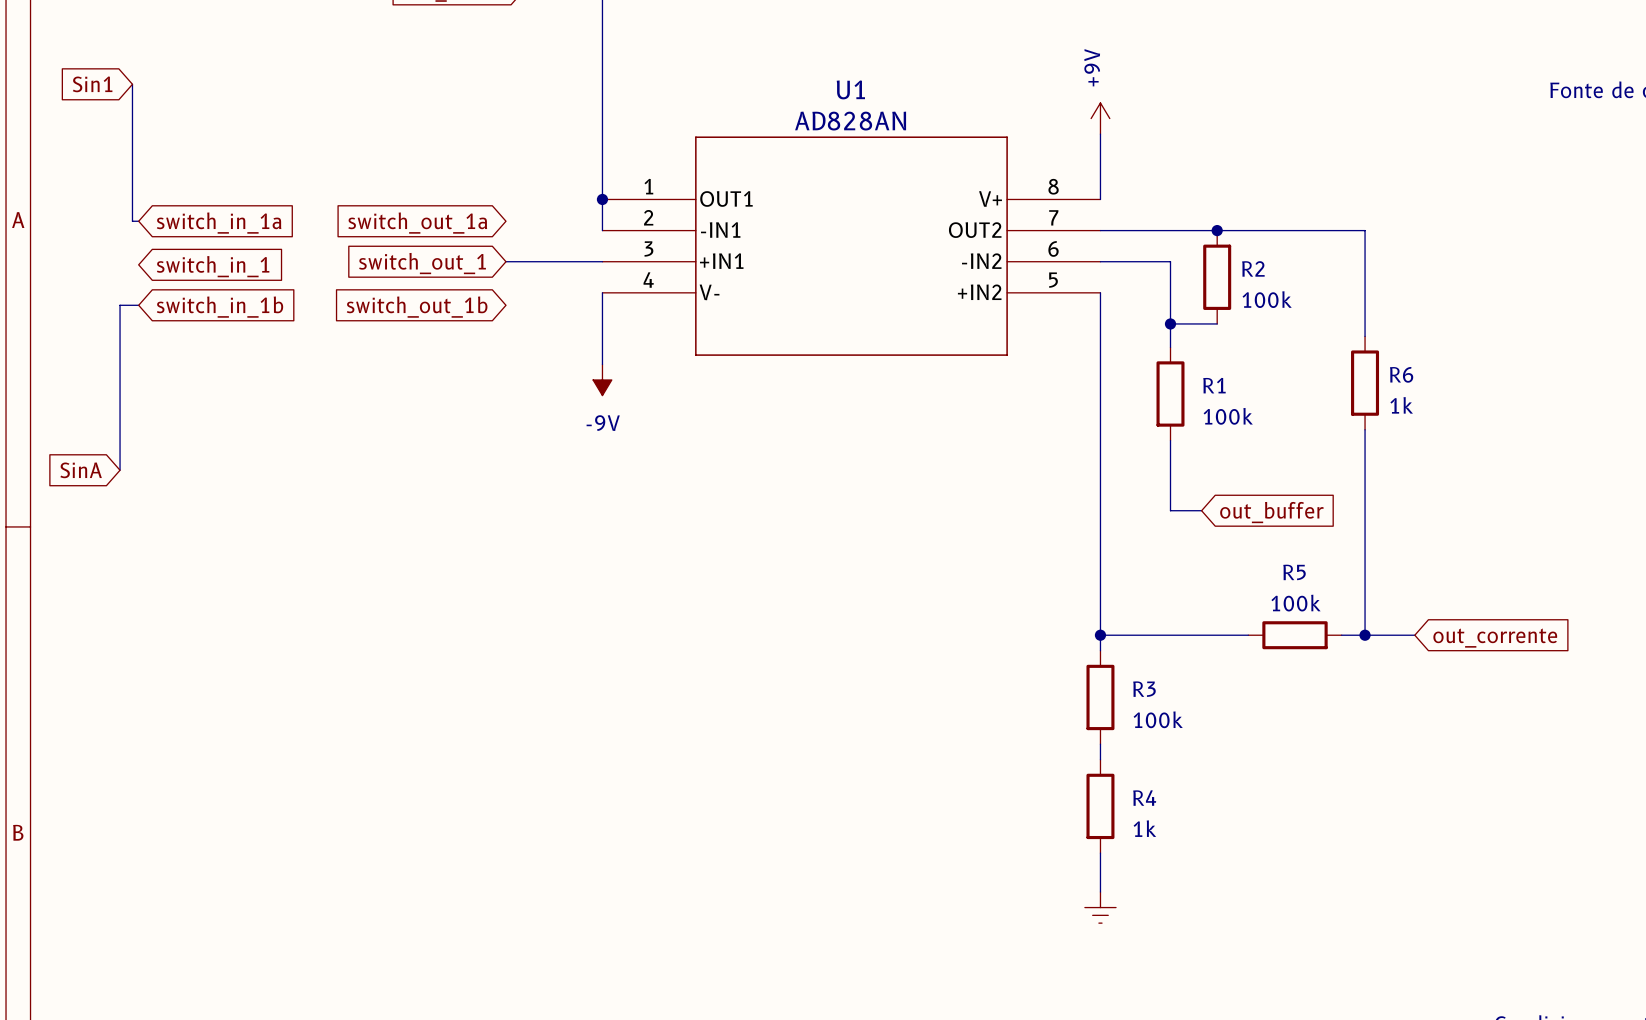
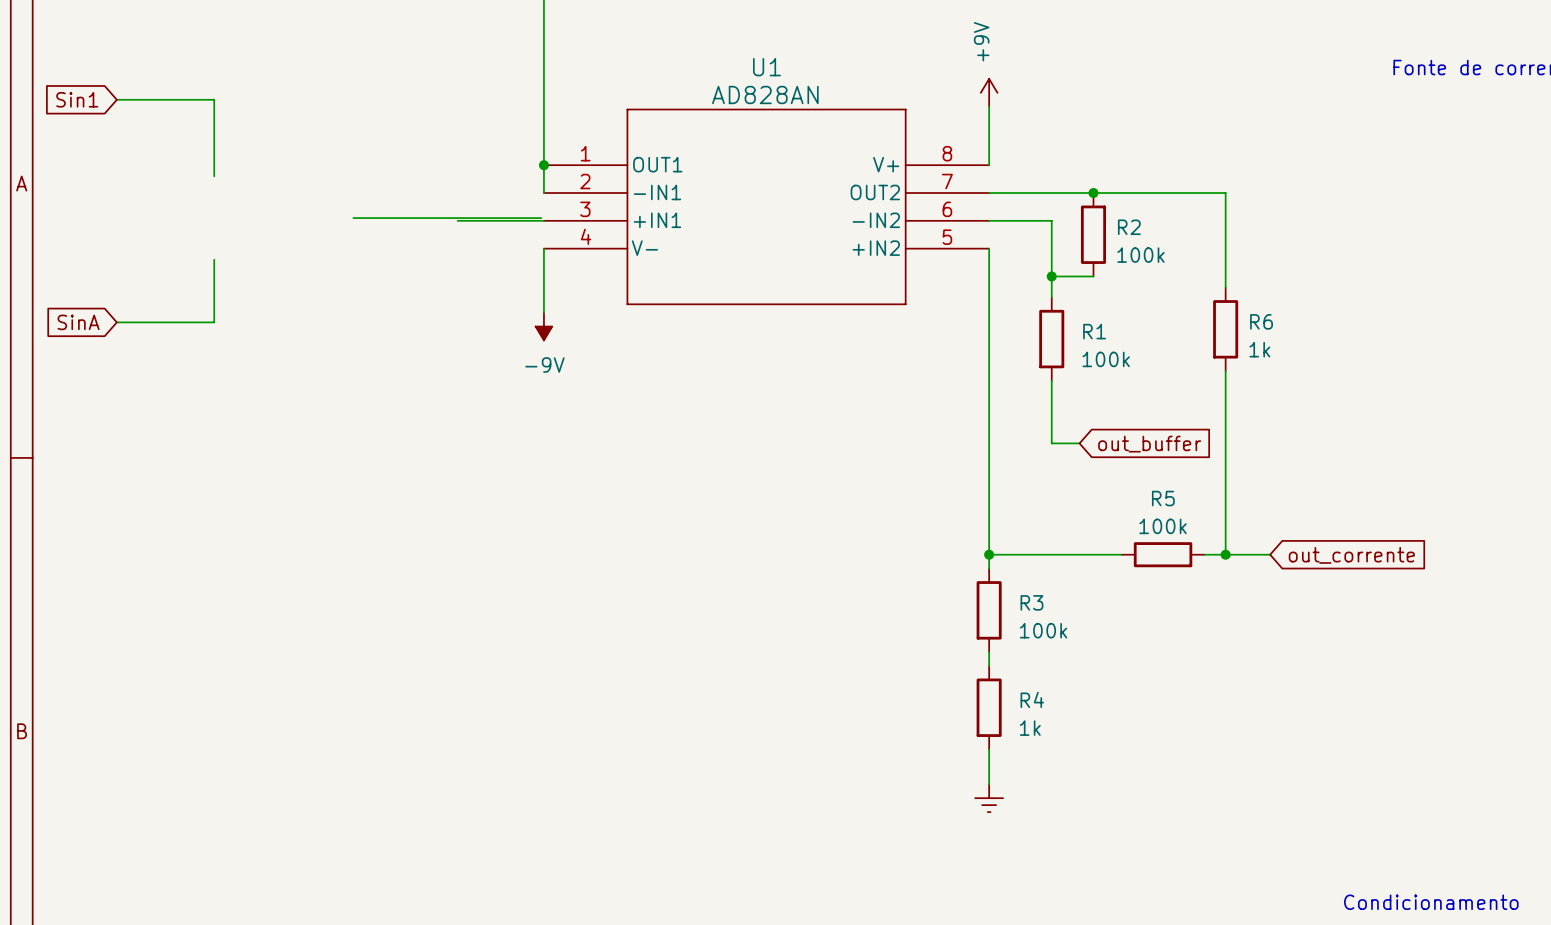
global label position: Sin1 (92, 84) -> Sin1 (77, 99)
wire: (132, 84) (132, 221) (138, 221) -> none
wire: none -> (116, 99) (214, 99) (214, 176)
global label: switch_in_1a (219, 223) -> none
global label: switch_out_1a (417, 223) -> none
wire: none -> (353, 218) (541, 218)
global label: switch_out_1 (422, 263) -> none
global label: switch_in_1 (213, 266) -> none
wire: (138, 305) (120, 305) (120, 470) -> none
wire: none -> (214, 259) (214, 322) (116, 322)
global label: switch_in_1b (220, 307) -> none
global label: switch_out_1b (417, 307) -> none
global label position: SinA (81, 470) -> SinA (78, 322)

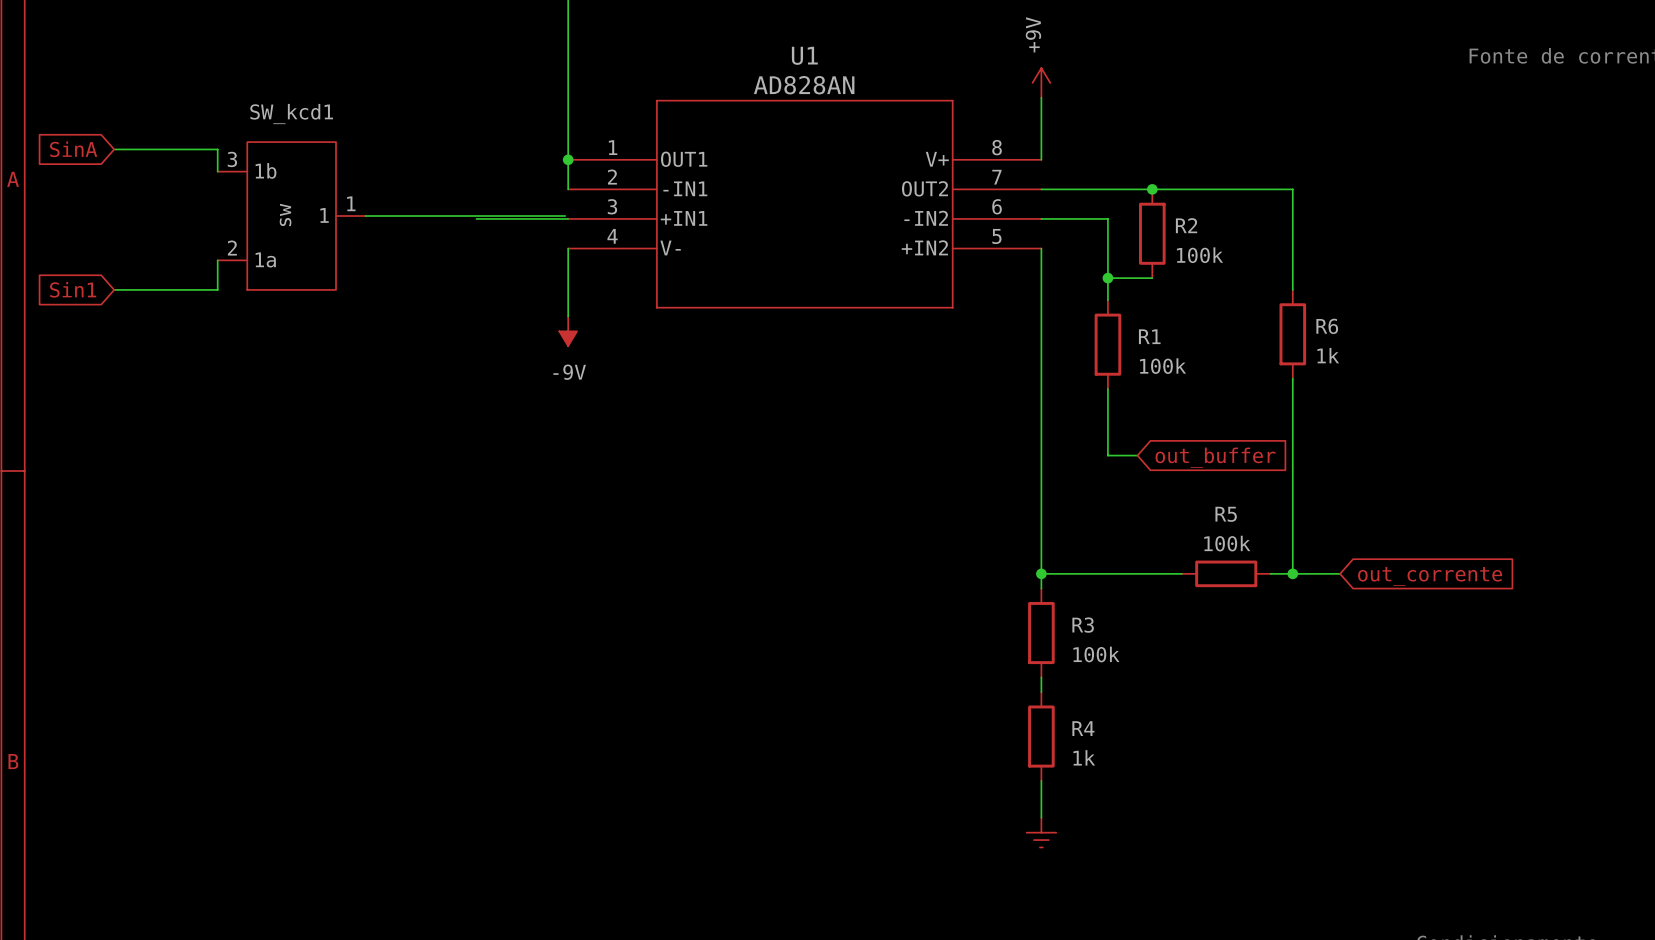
global label position: Sin1 (77, 99) -> Sin1 (73, 289)
wire: (116, 99) (214, 99) (214, 155) -> (114, 149) (217, 149)
SW_kcd1: none -> sw (291, 216)
wire: (214, 287) (214, 322) (116, 322) -> (217, 289) (114, 289)
global label position: SinA (78, 322) -> SinA (73, 149)

